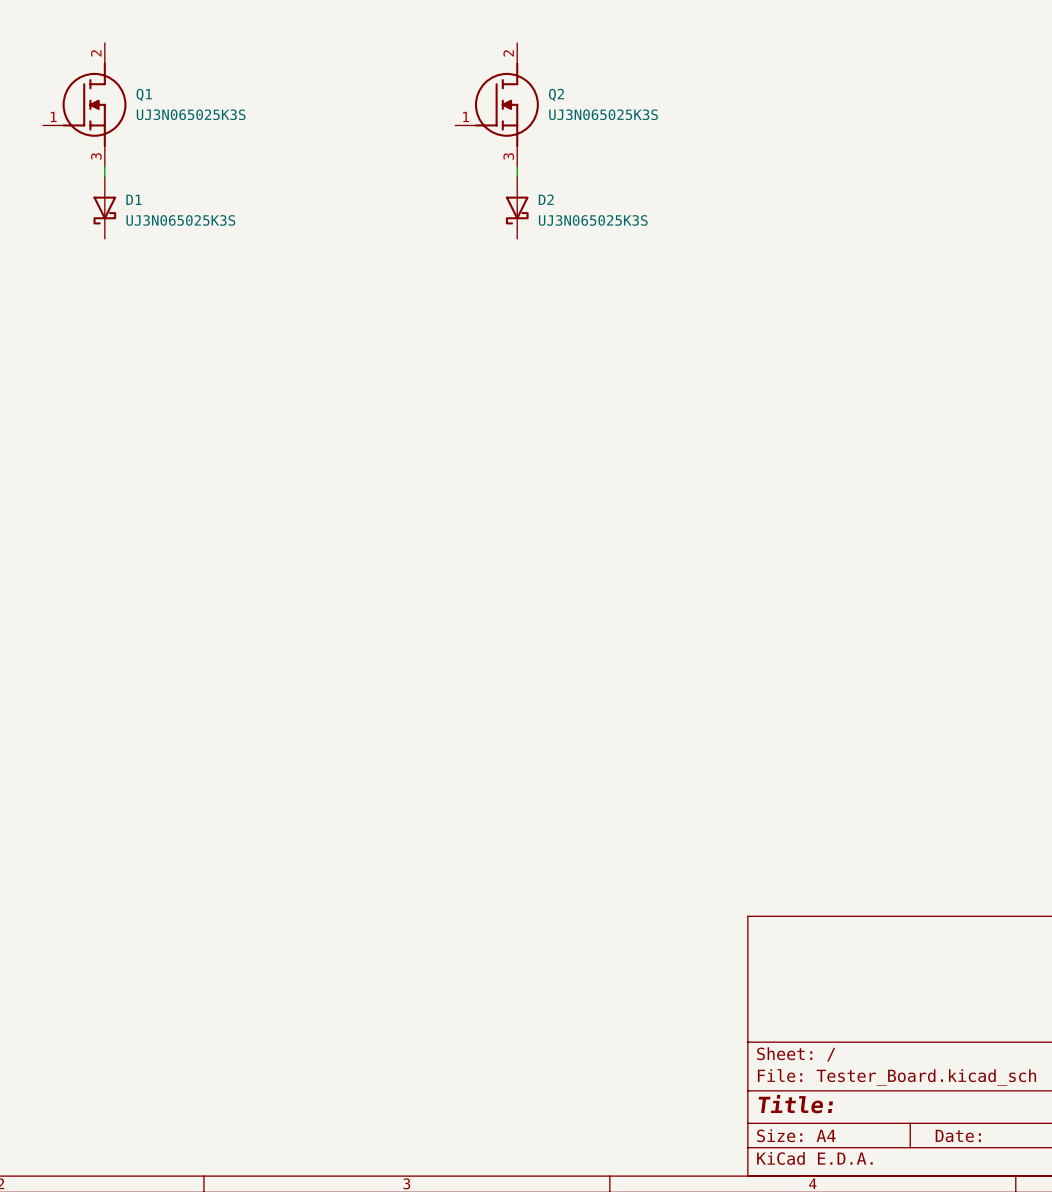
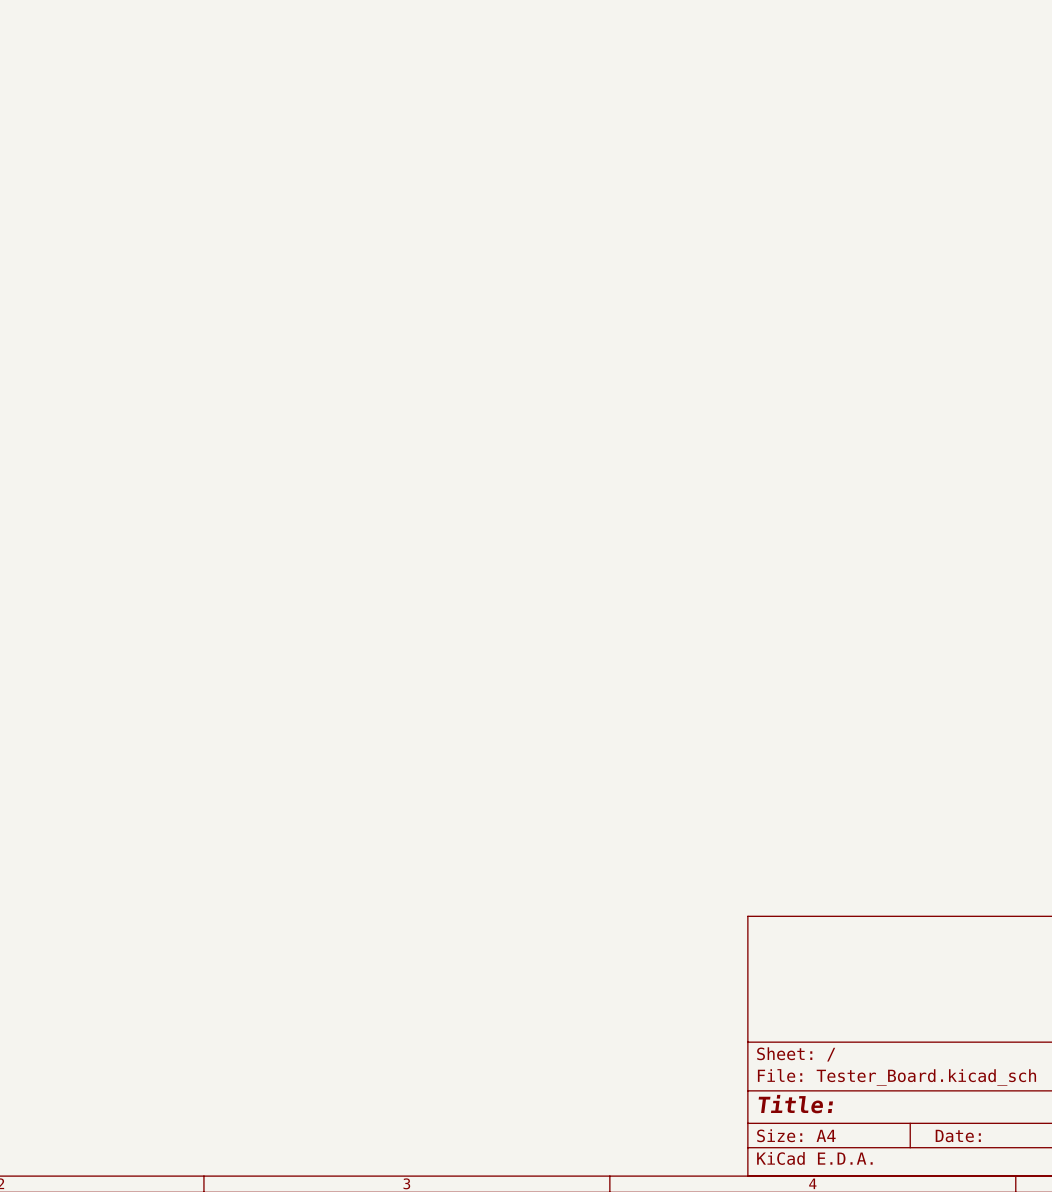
Q1: UJ3N065025K3S (84, 104) -> none
Q2: UJ3N065025K3S (497, 104) -> none
wire: (104, 166) (104, 177) -> none
wire: (517, 166) (517, 177) -> none
D1: UJ3N065025K3S (104, 207) -> none
D2: UJ3N065025K3S (517, 207) -> none

